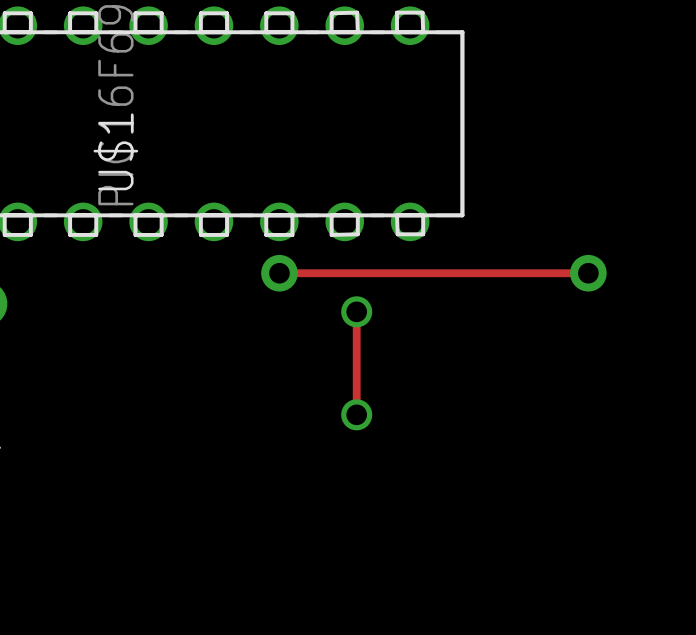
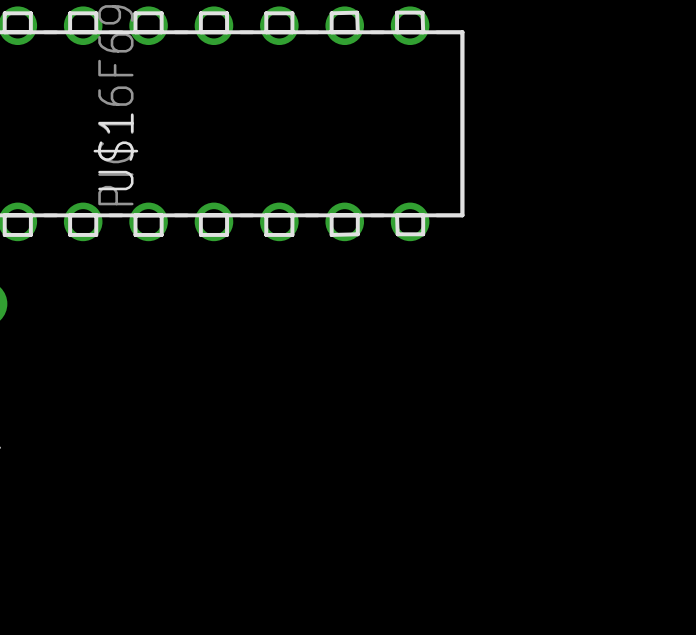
track: (279, 273) (588, 273) -> none
via: (279, 273) -> none
via: (588, 273) -> none
track: (356, 311) (356, 414) -> none
via: (356, 311) -> none
via: (356, 414) -> none

